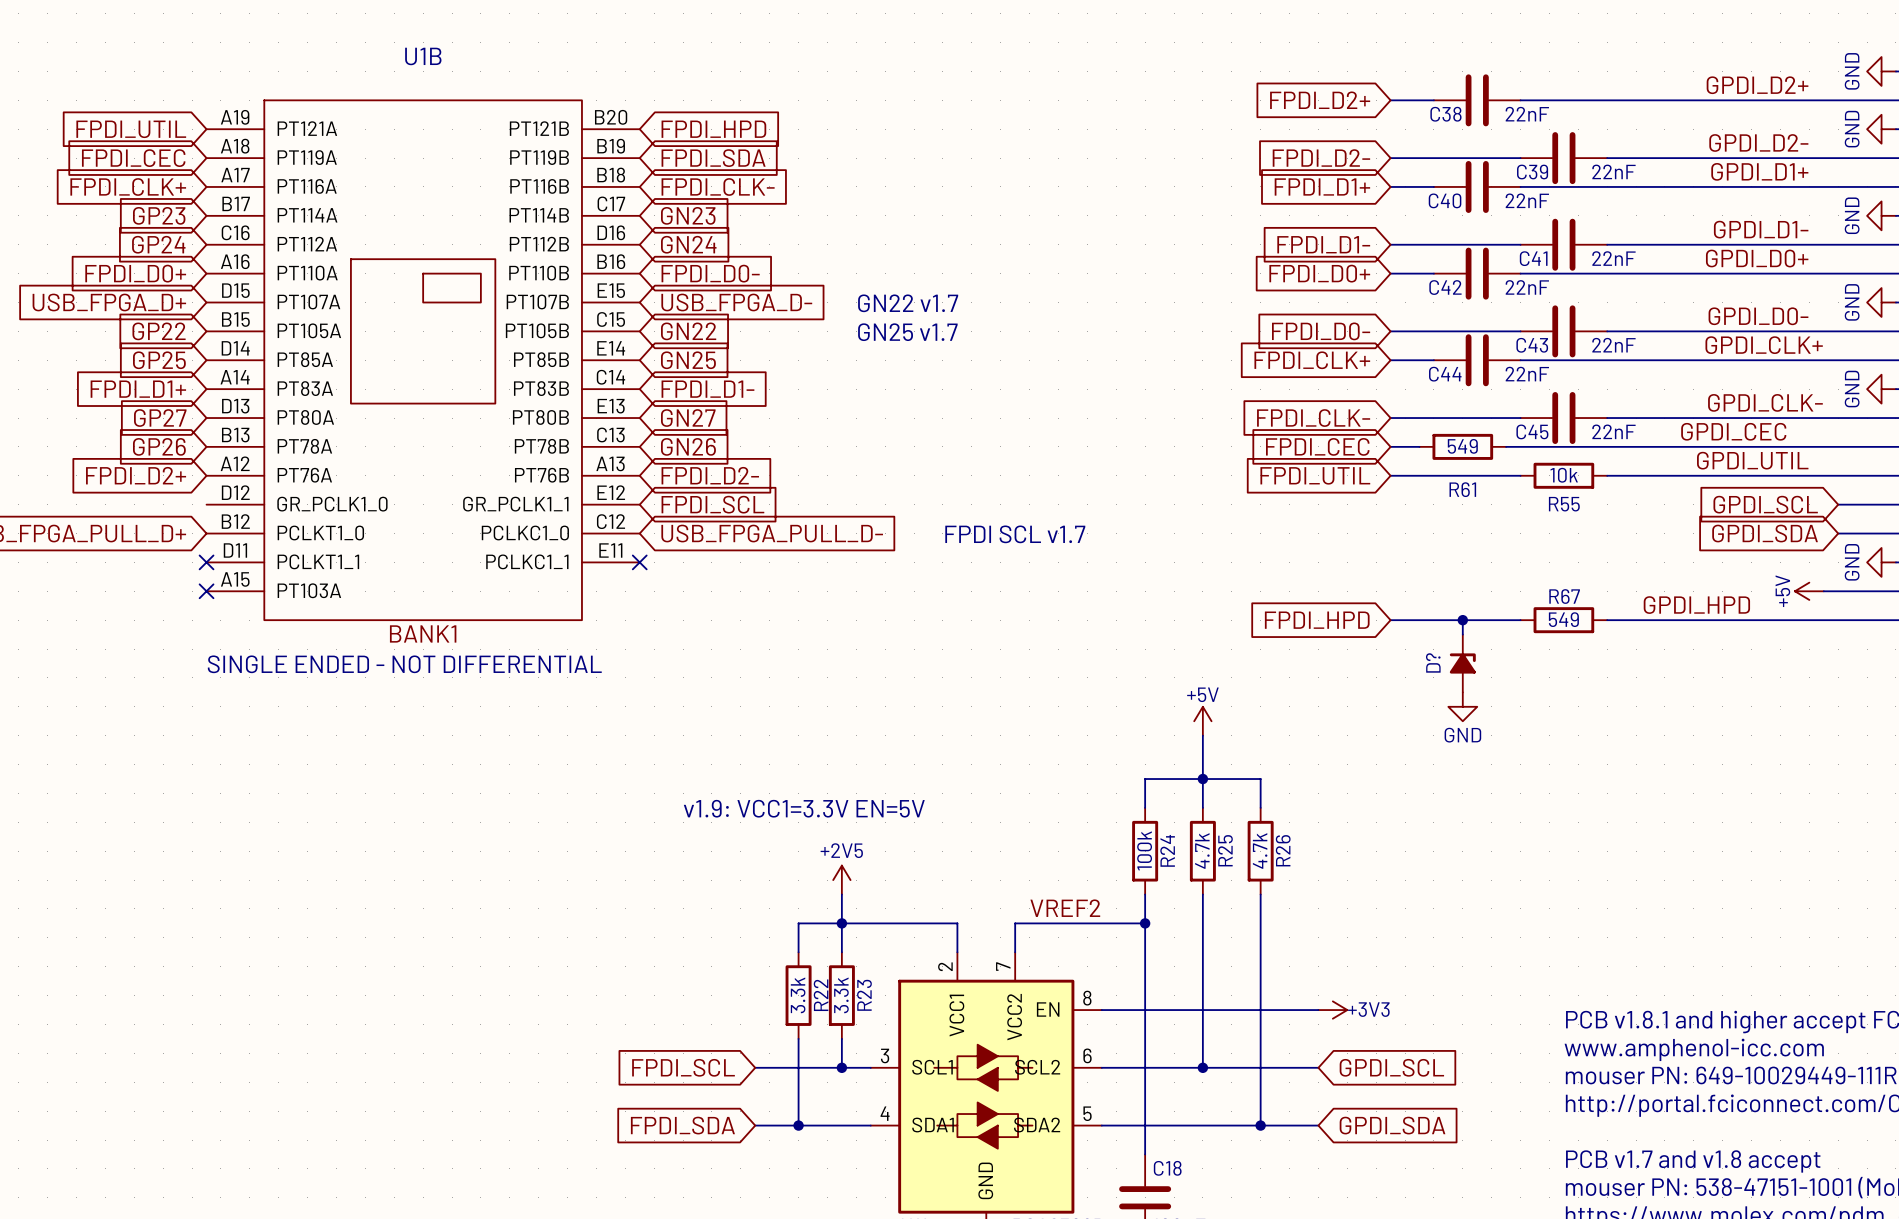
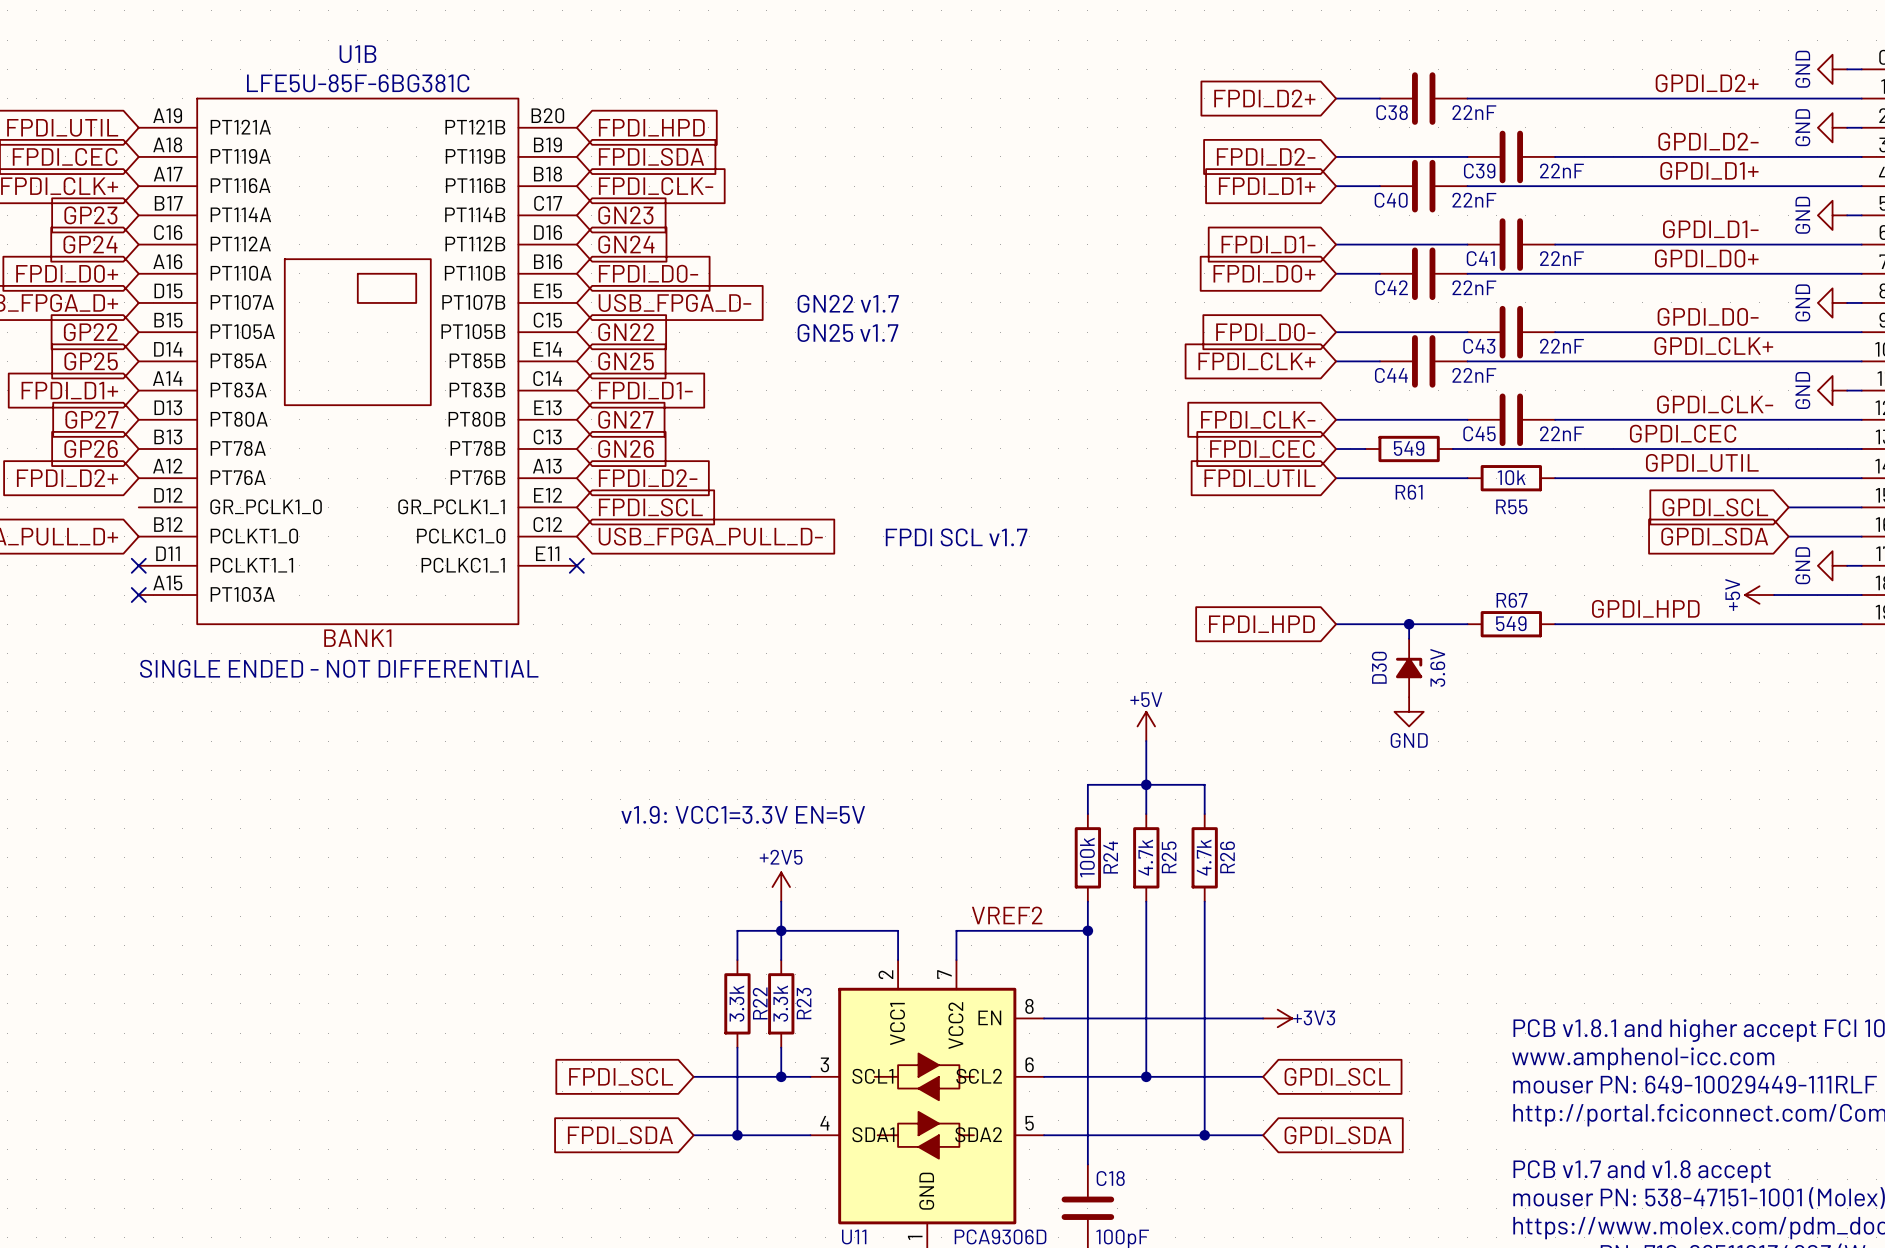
U1B value: none -> LFE5U-85F-6BG381C (358, 83)
D? name: D? (1433, 662) -> D30 (1379, 667)
D? value: none -> 3.6V (1437, 667)

